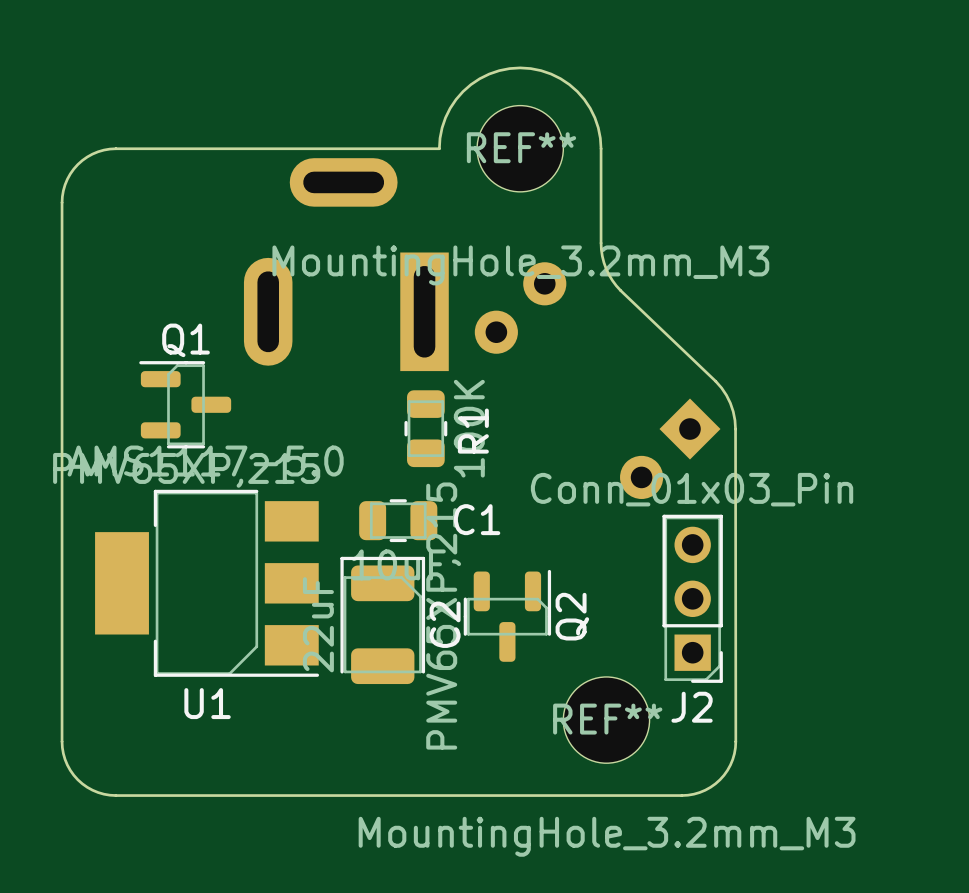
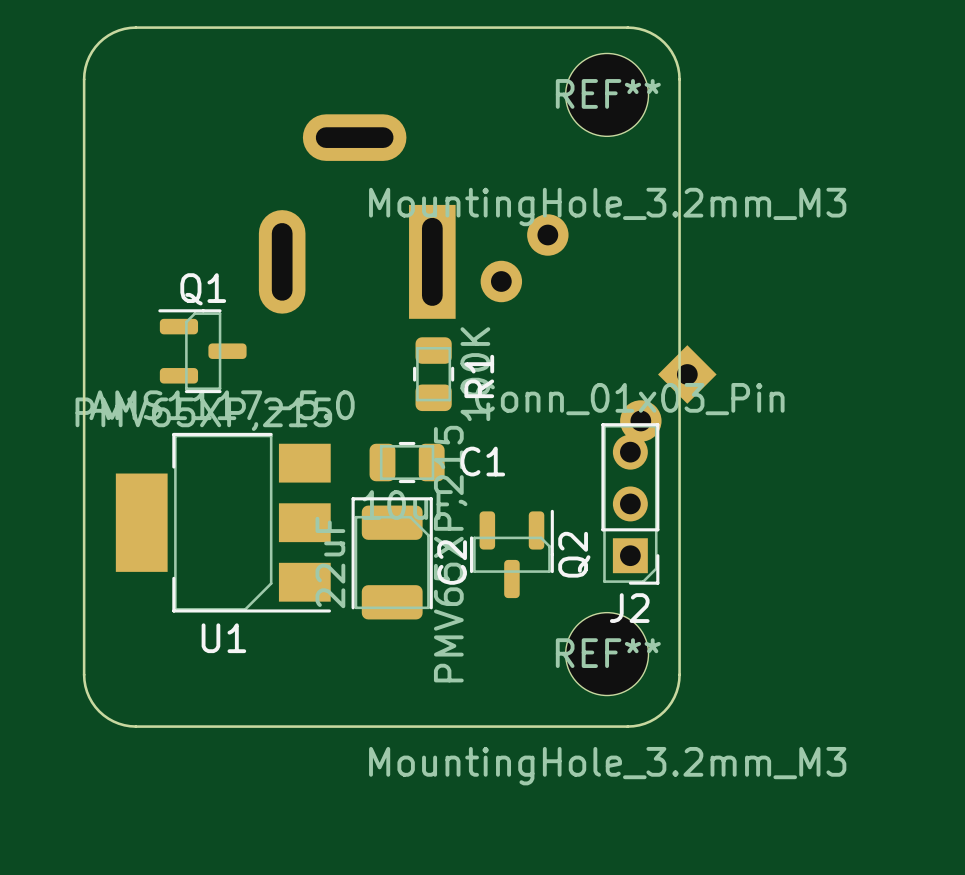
REF** position: (520, 148) -> (607, 94)
board edge: (62, 202) (65, 184) (73, 169) (87, 157) (103, 150) (439, 148) (445, 117) (456, 99) (470, 84) (489, 74) (509, 68) (530, 68) (551, 74) (577, 91) (594, 117) (600, 138) (601, 249) (609, 274) (620, 290) (721, 388) (730, 403) (734, 420) (734, 753) (730, 765) (720, 779) (699, 792) (681, 795) (628, 795) -> (84, 157) (84, 79) (87, 62) (99, 42) (108, 35) (124, 28) (627, 27) (644, 30) (664, 42) (674, 56) (679, 79) (679, 674) (676, 691) (664, 711) (644, 723) (627, 726)
J2 position: (692, 598) -> (630, 503)

